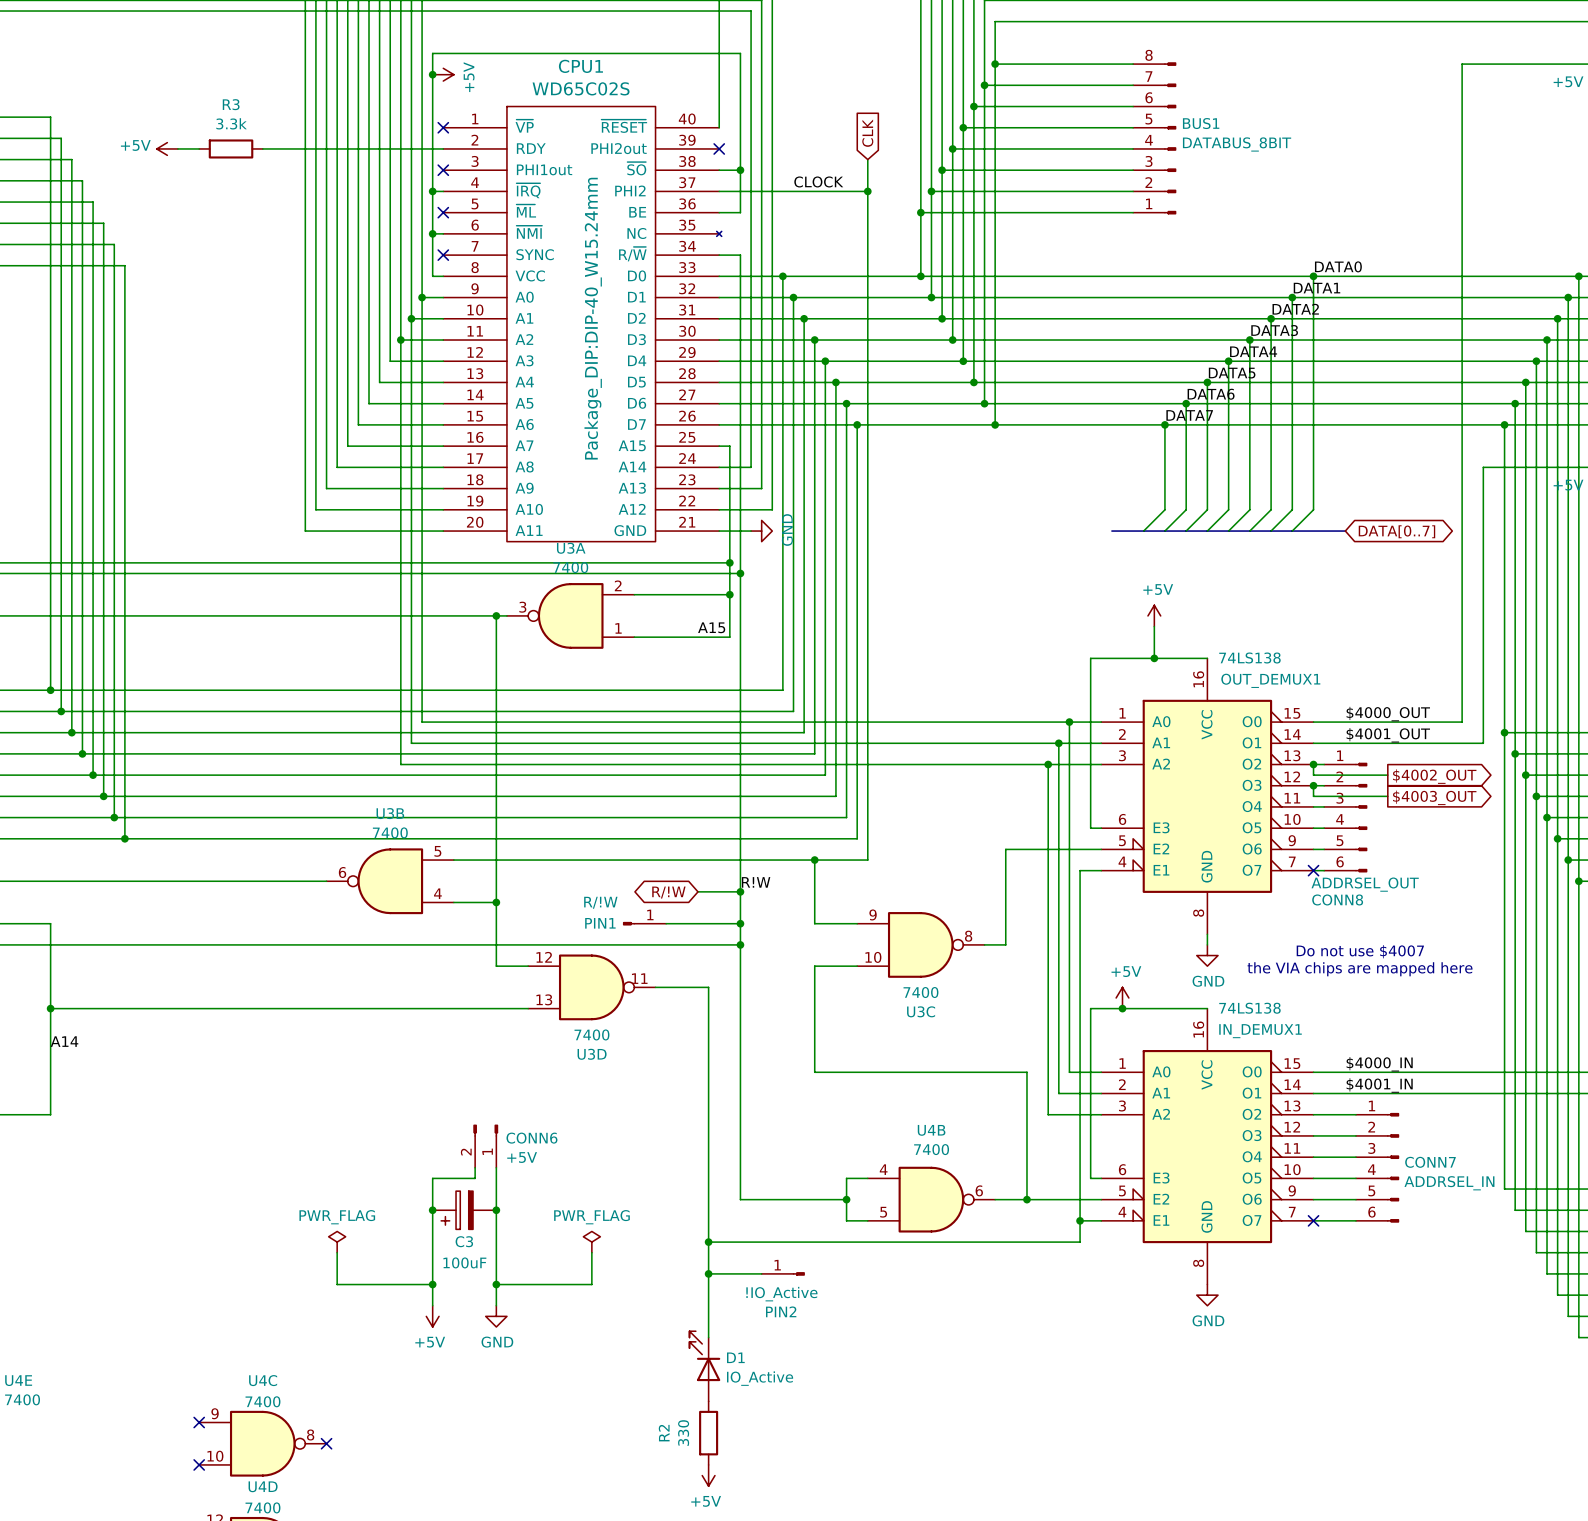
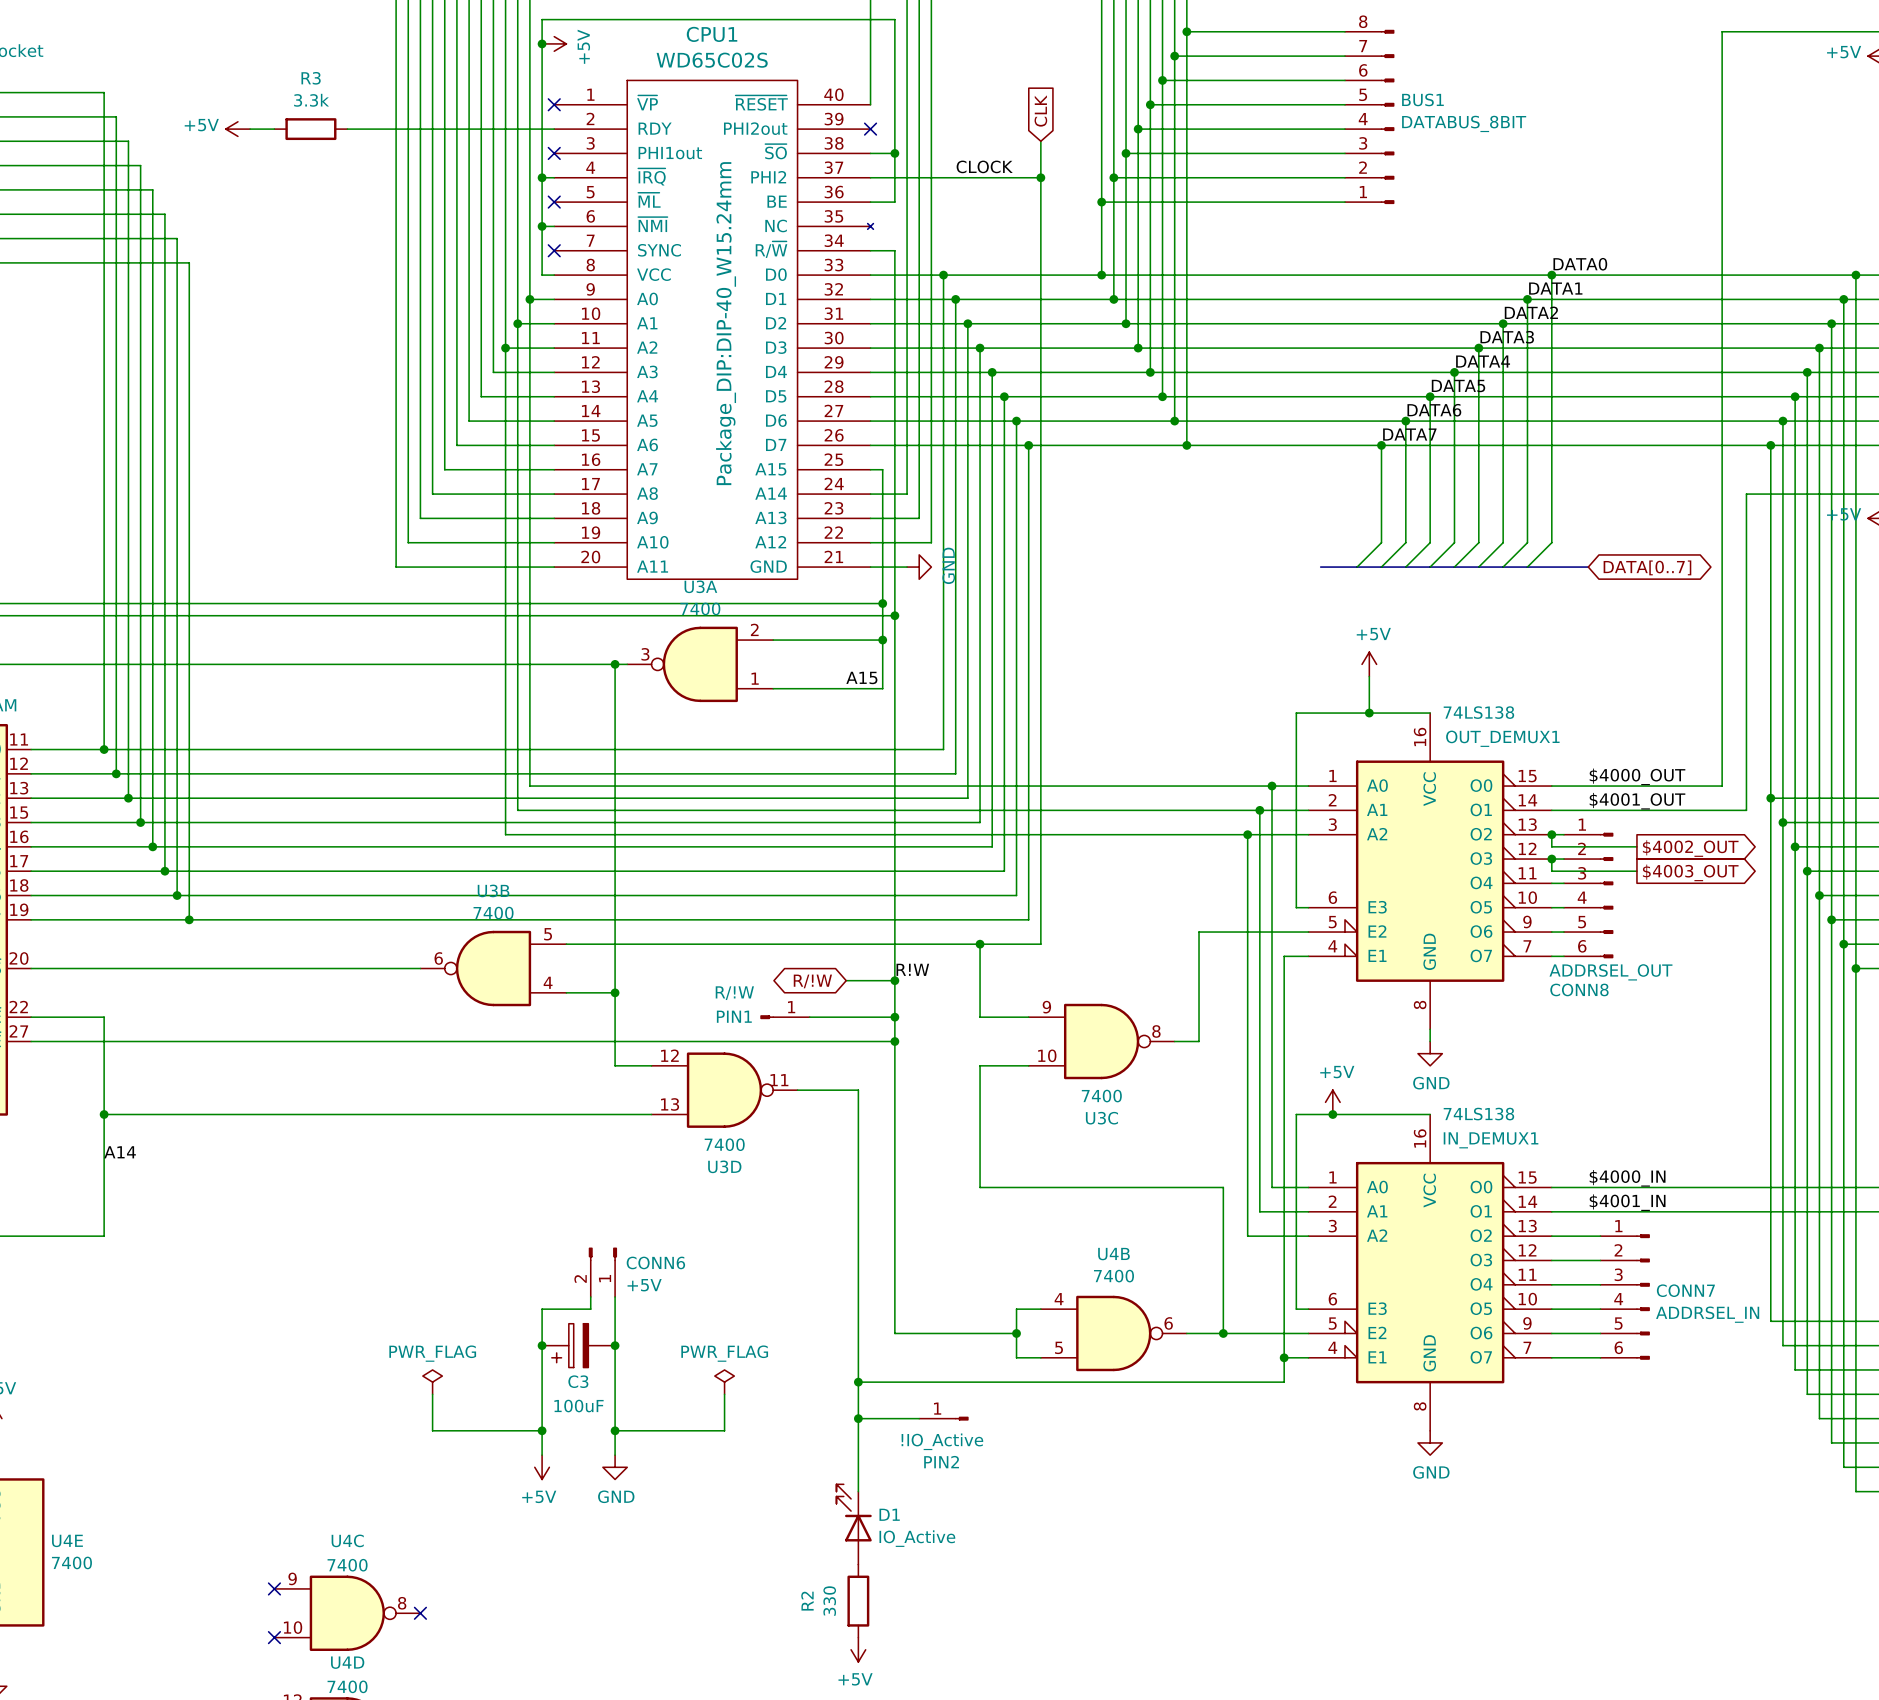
no-connect mark: (1313, 870) -> none
text: Do not use $4007 (1360, 951) -> none
text: the VIA chips are mapped here (1360, 969) -> none
no-connect mark: (1313, 1220) -> none

